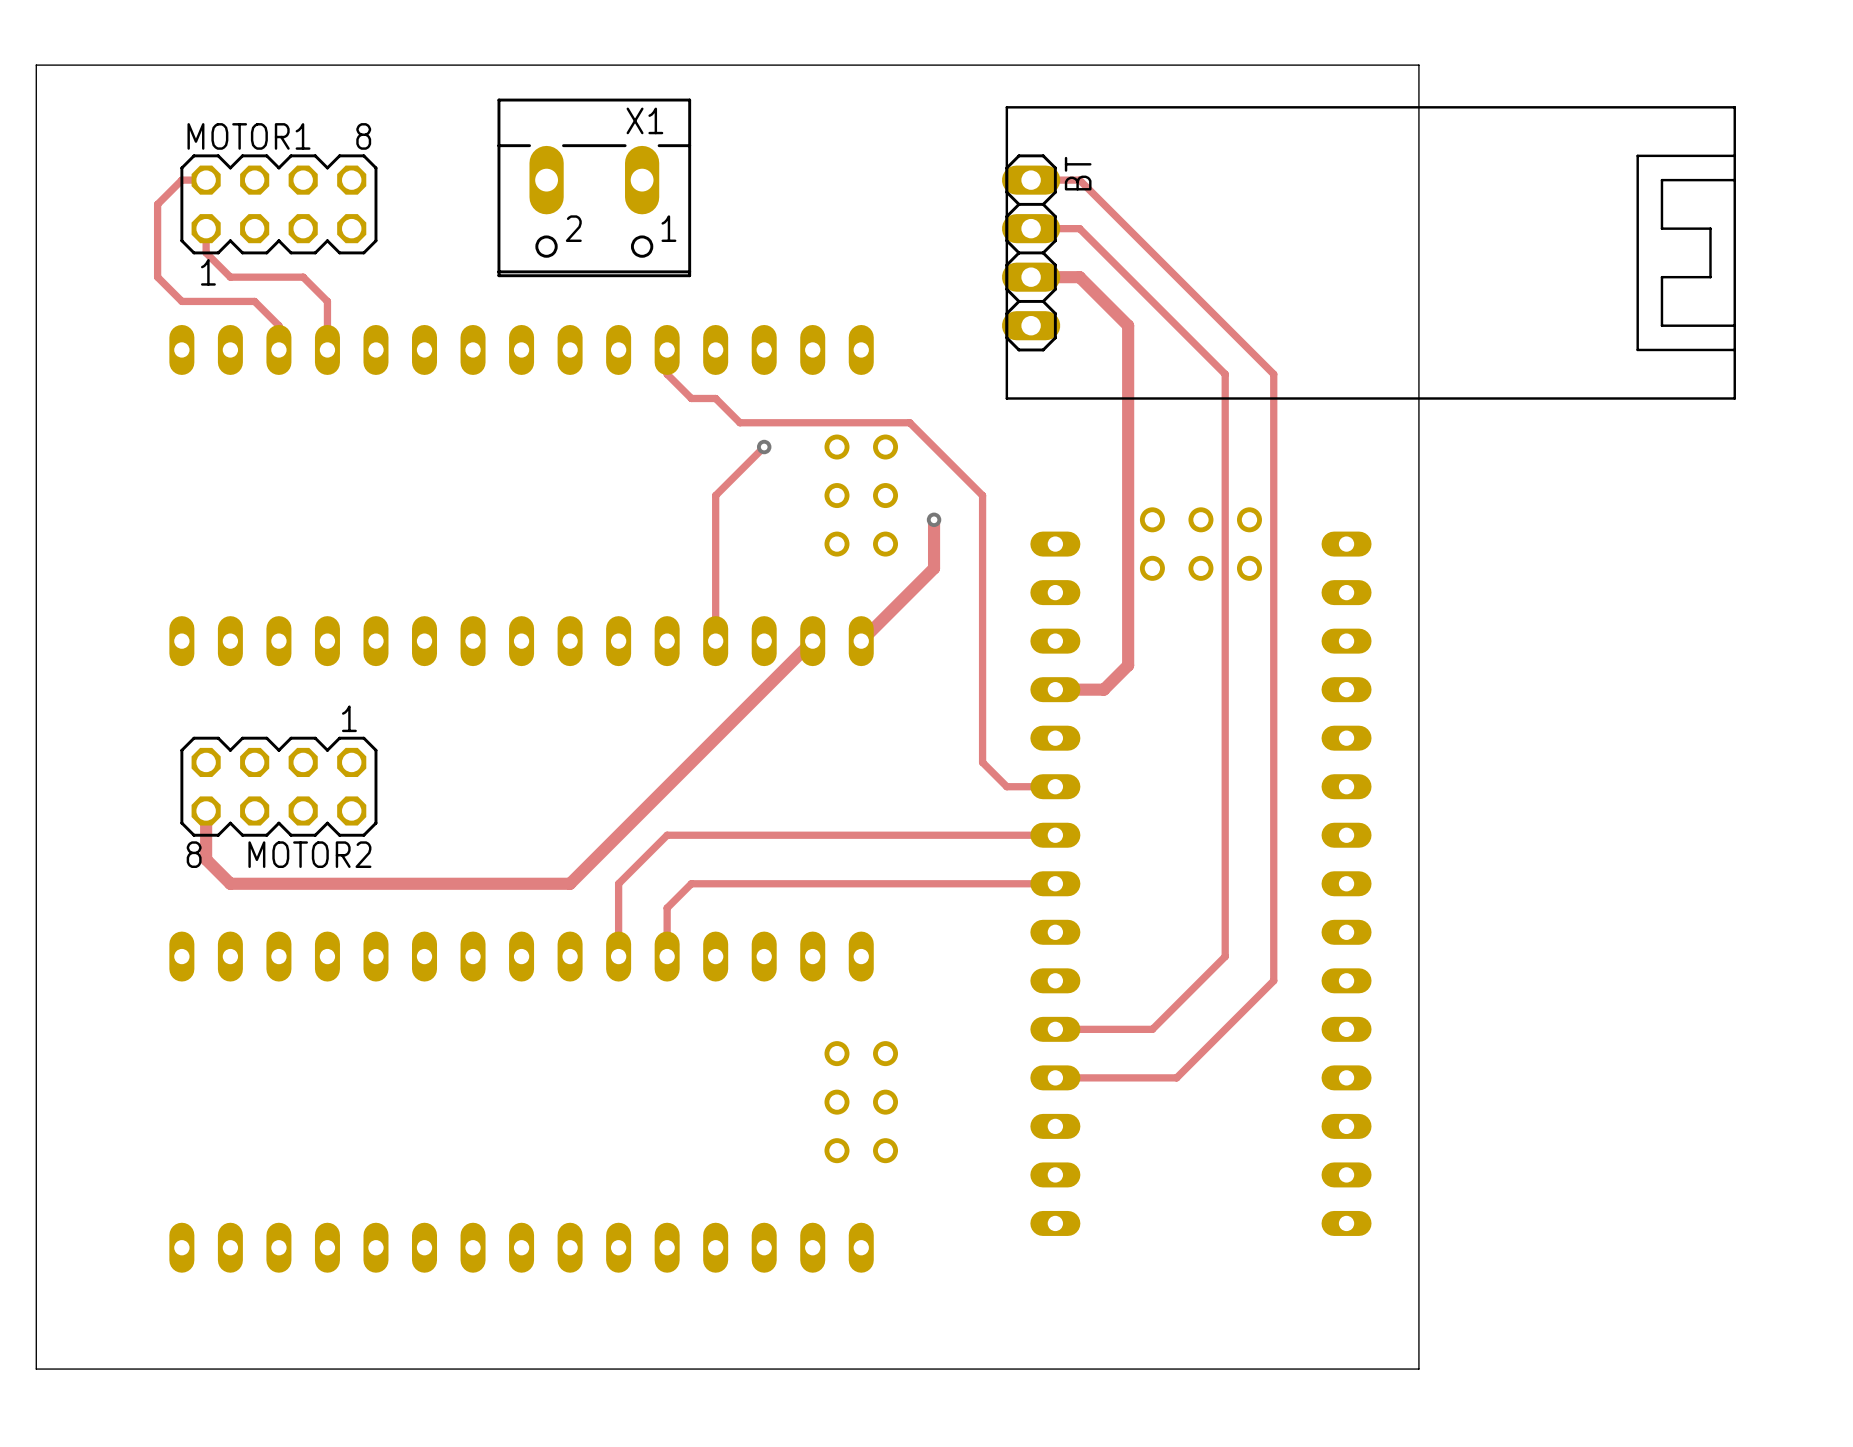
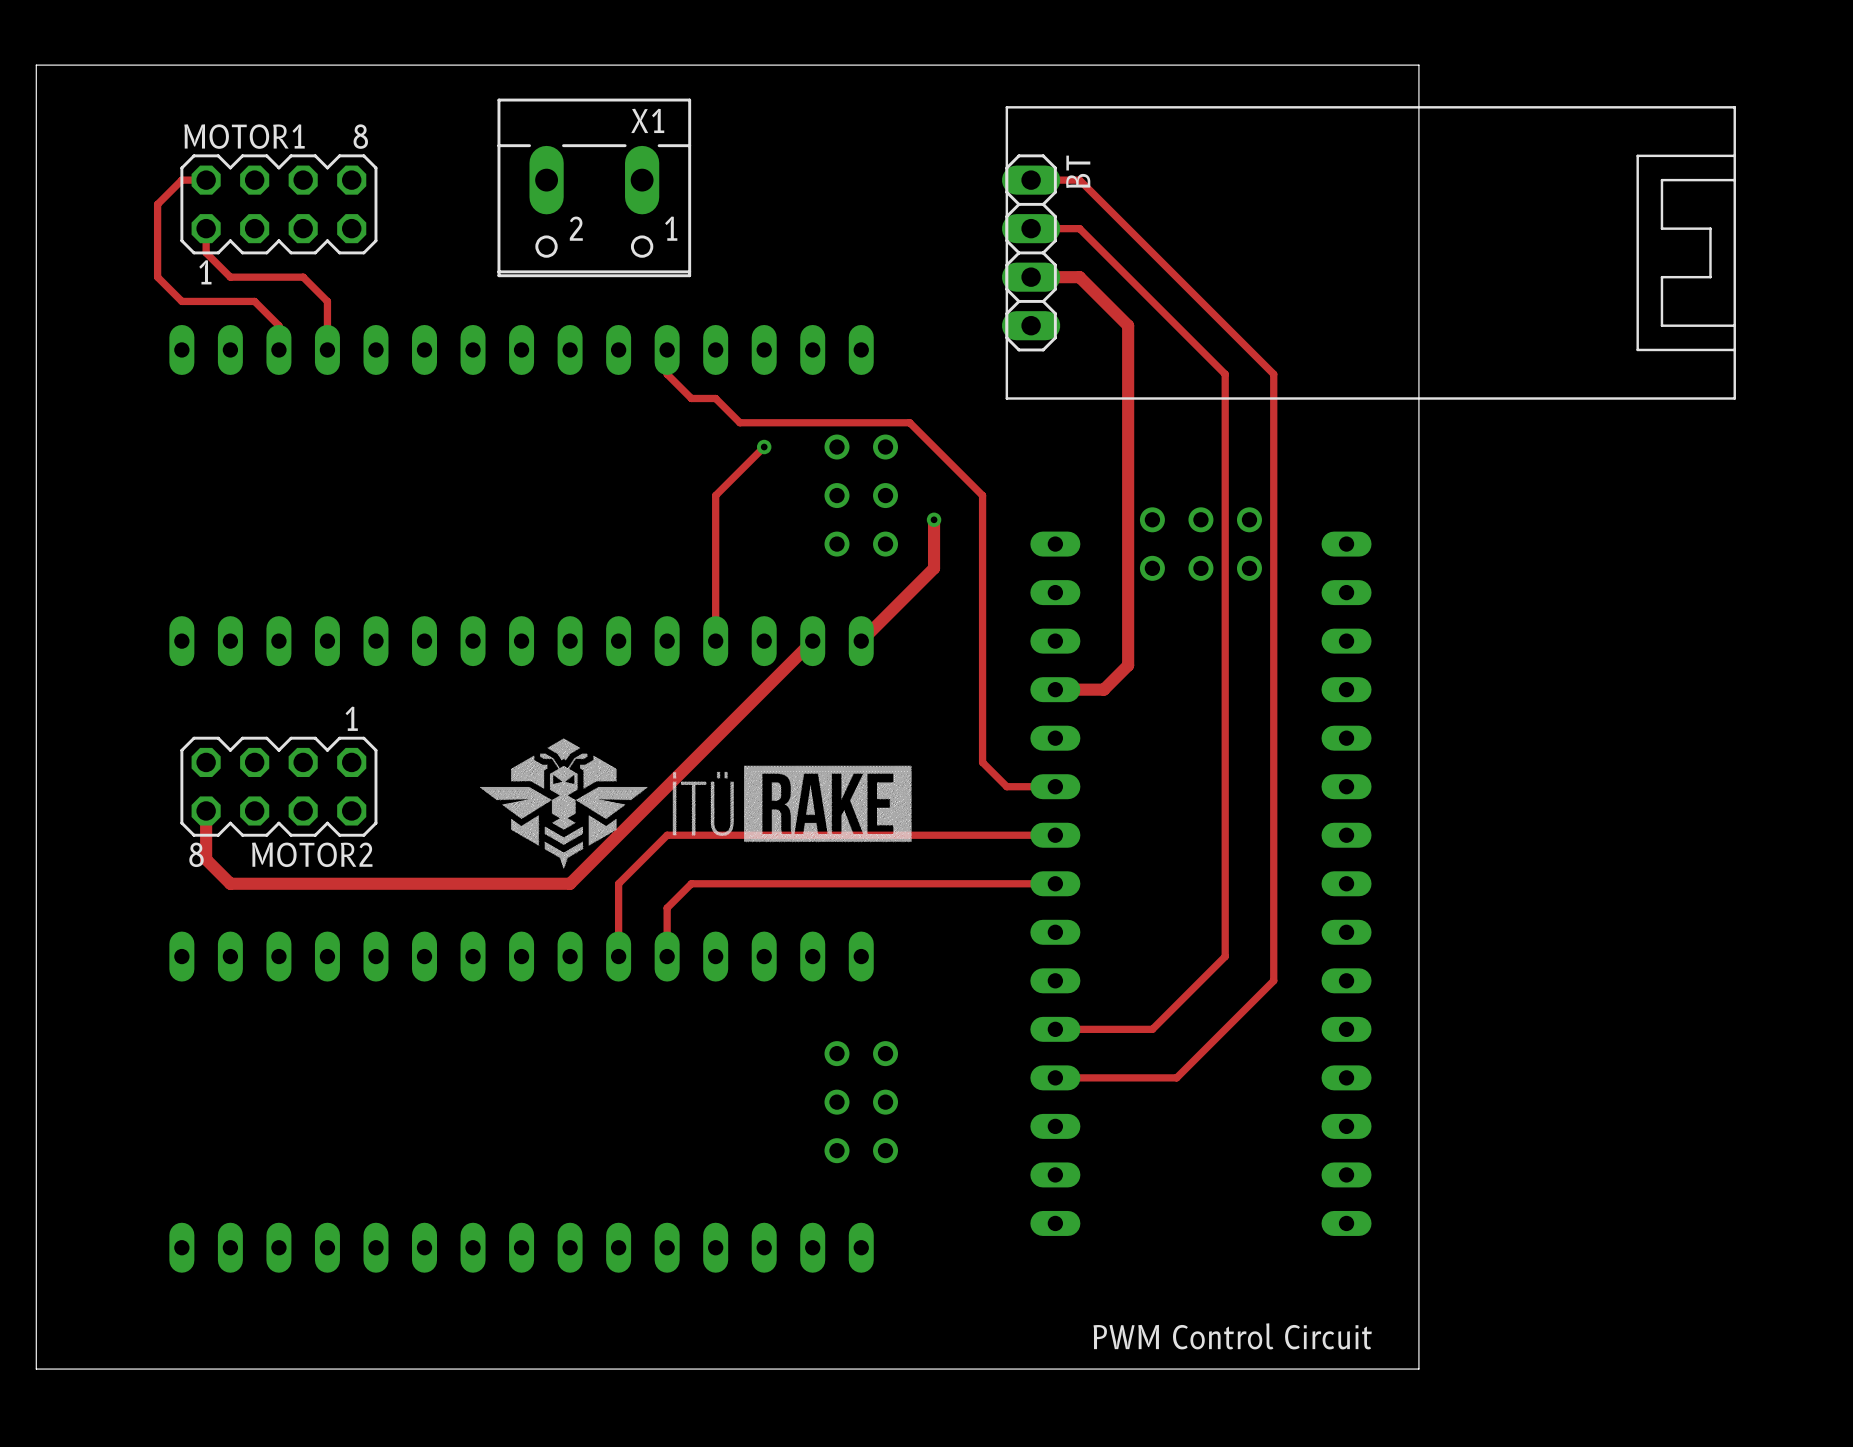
drawing: none -> [480, 738, 648, 869]
drawing: none -> [672, 765, 912, 843]
text: none -> PWM Control Circuit (1232, 1336)

